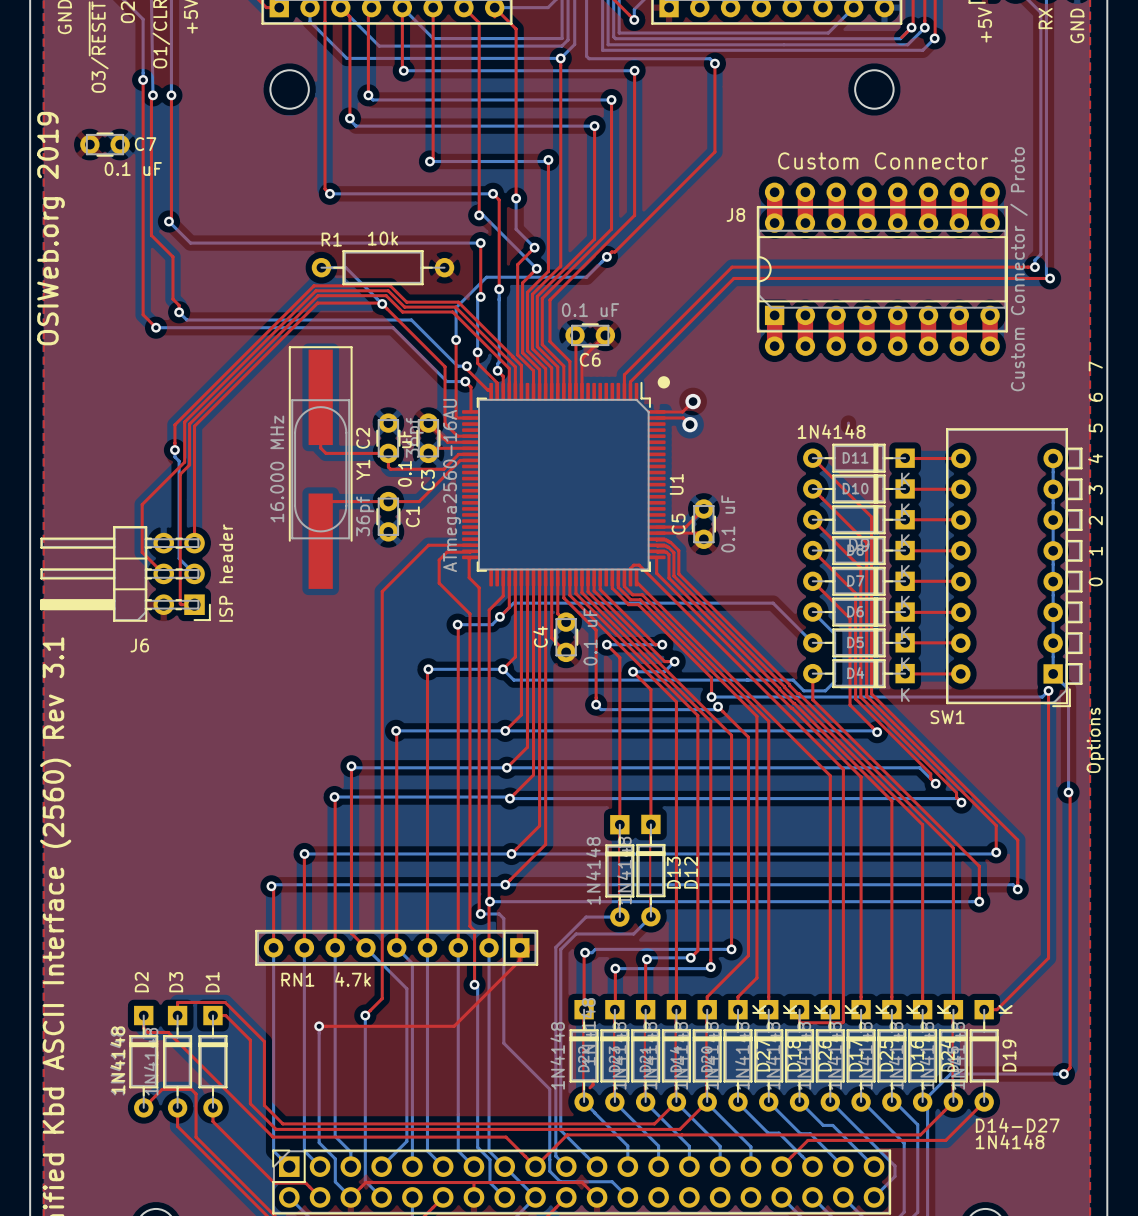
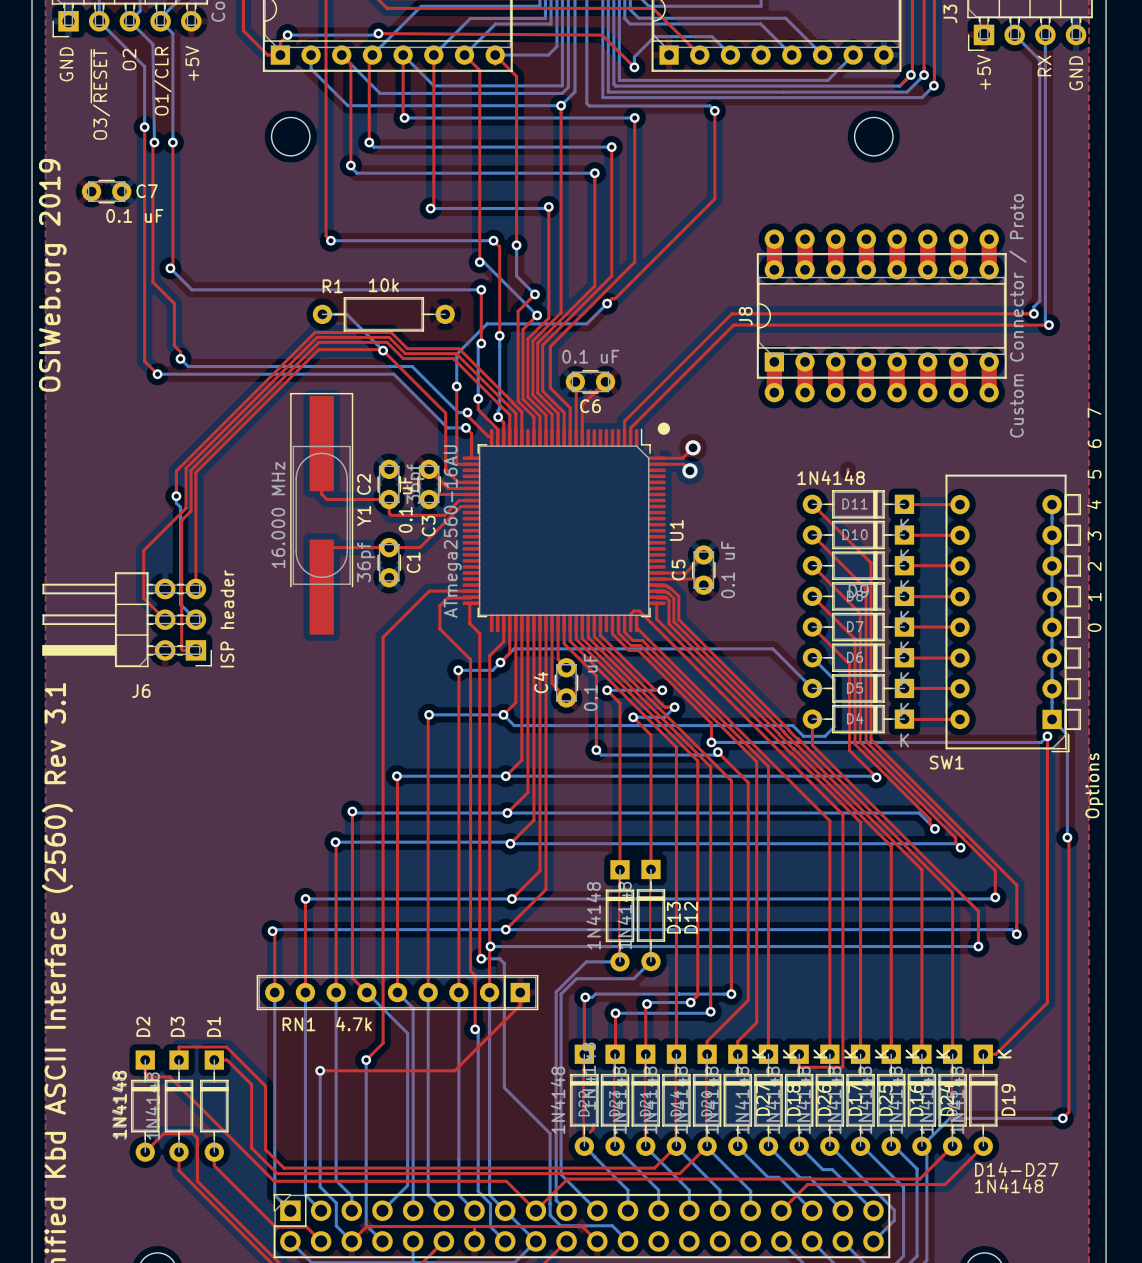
text: Custom Connector (883, 160) -> none
J8 name rotation: 0° (735, 214) -> 90° counterclockwise (745, 316)
J8 name position: J8 (735, 214) -> J8 (745, 316)

